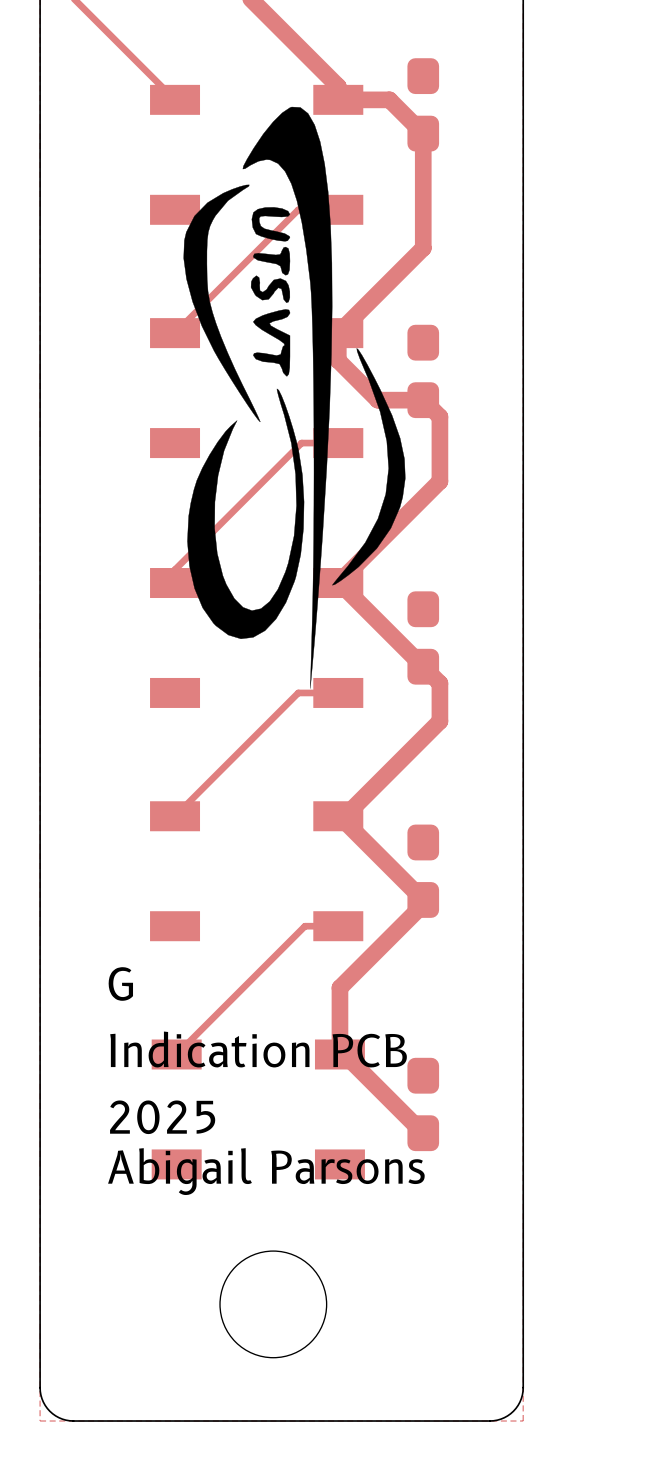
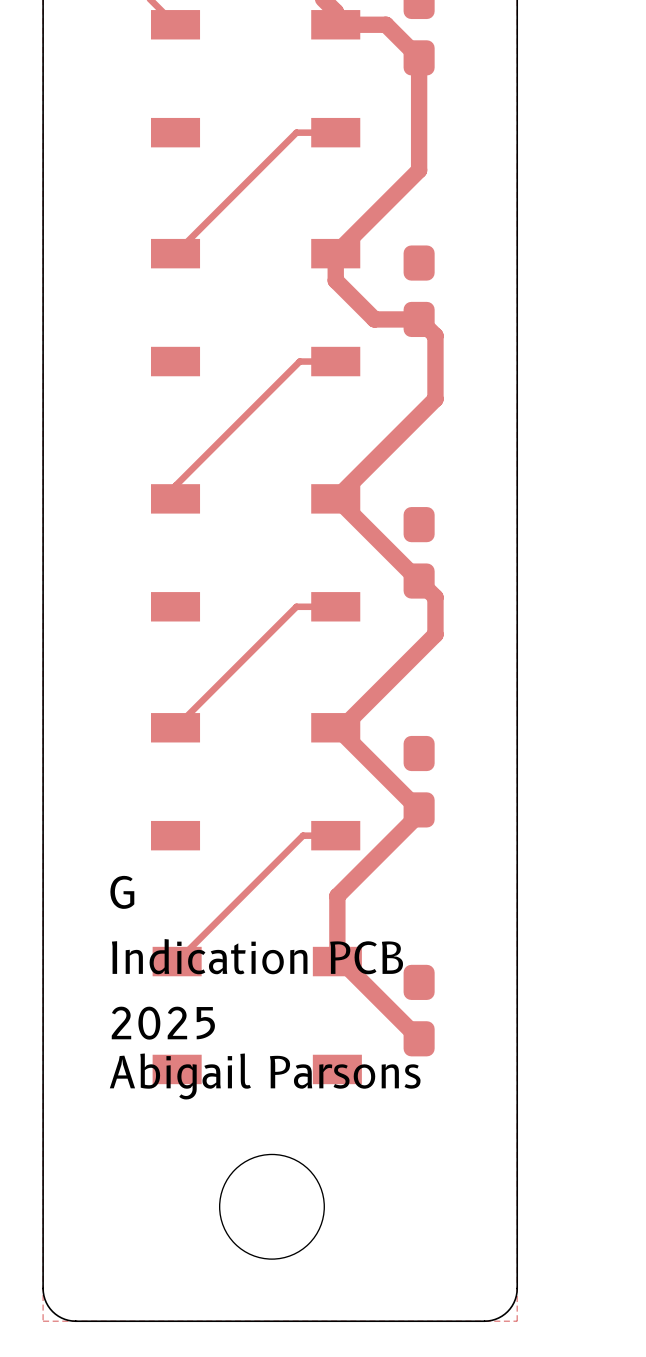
drawing: [183, 106, 406, 689] -> none

